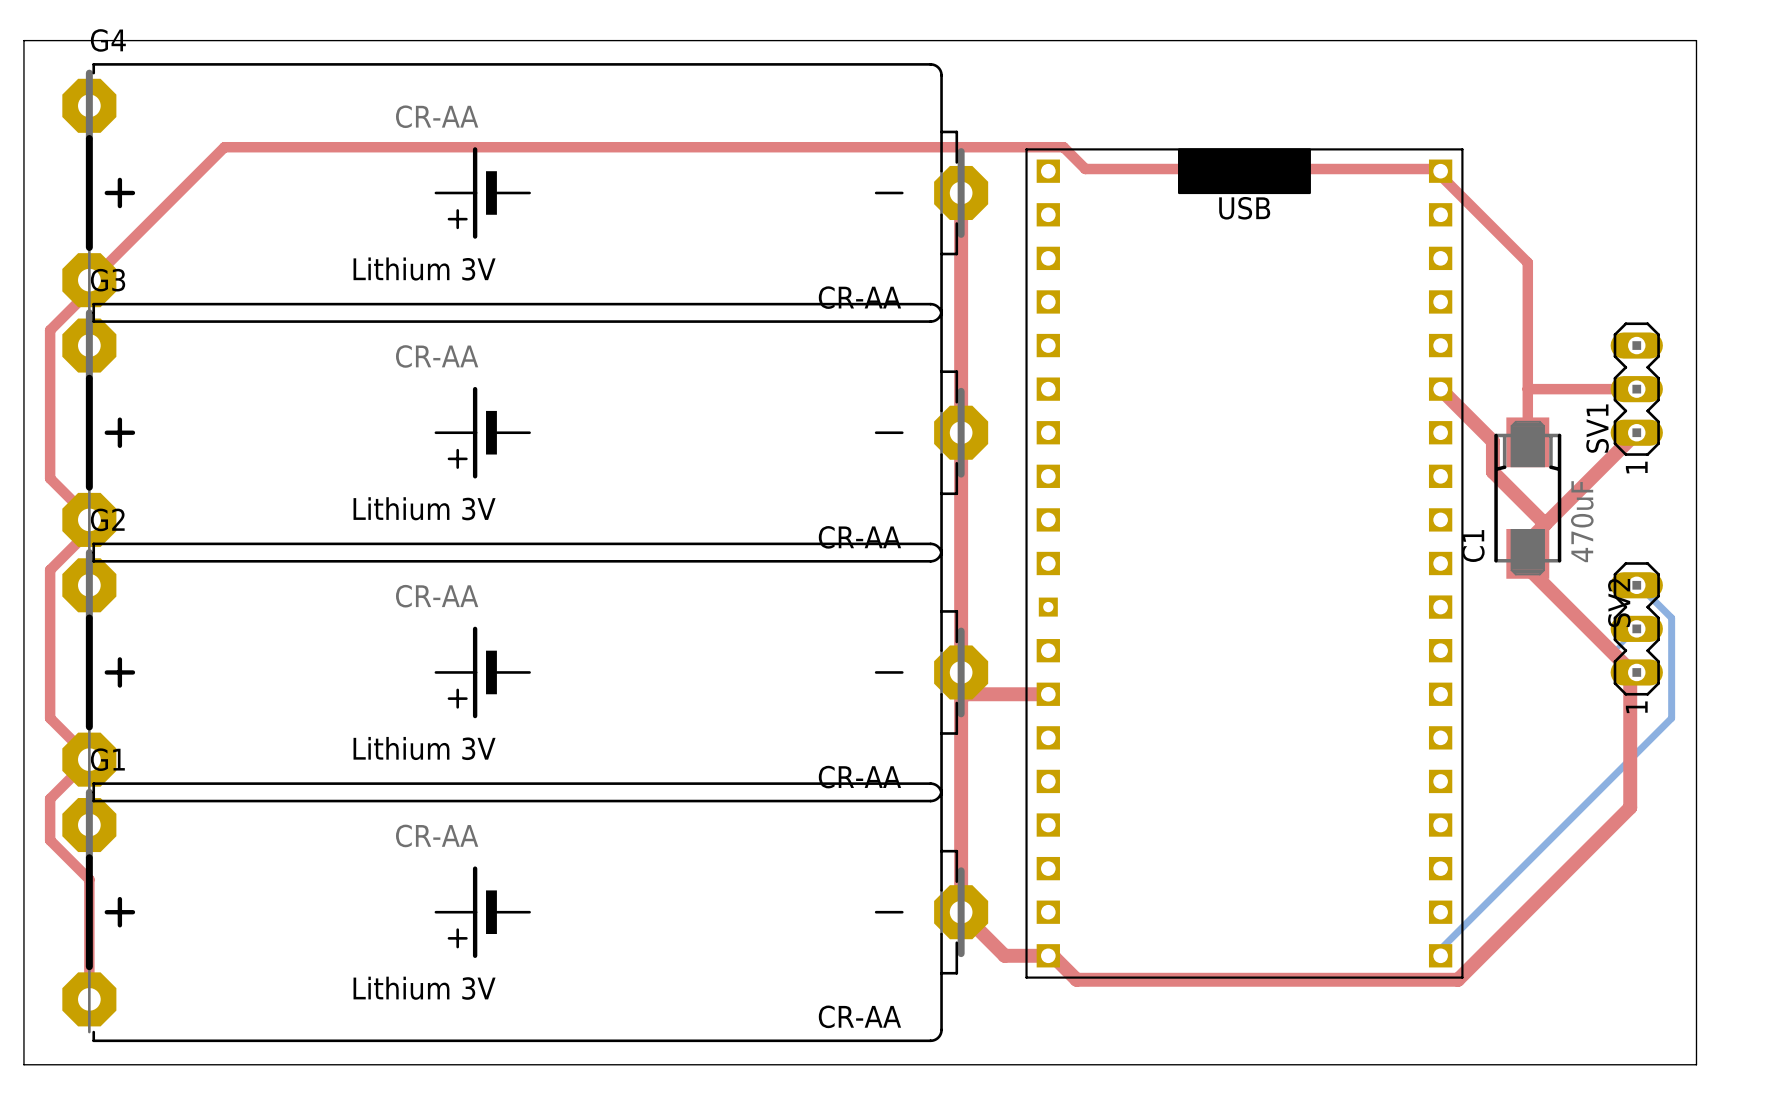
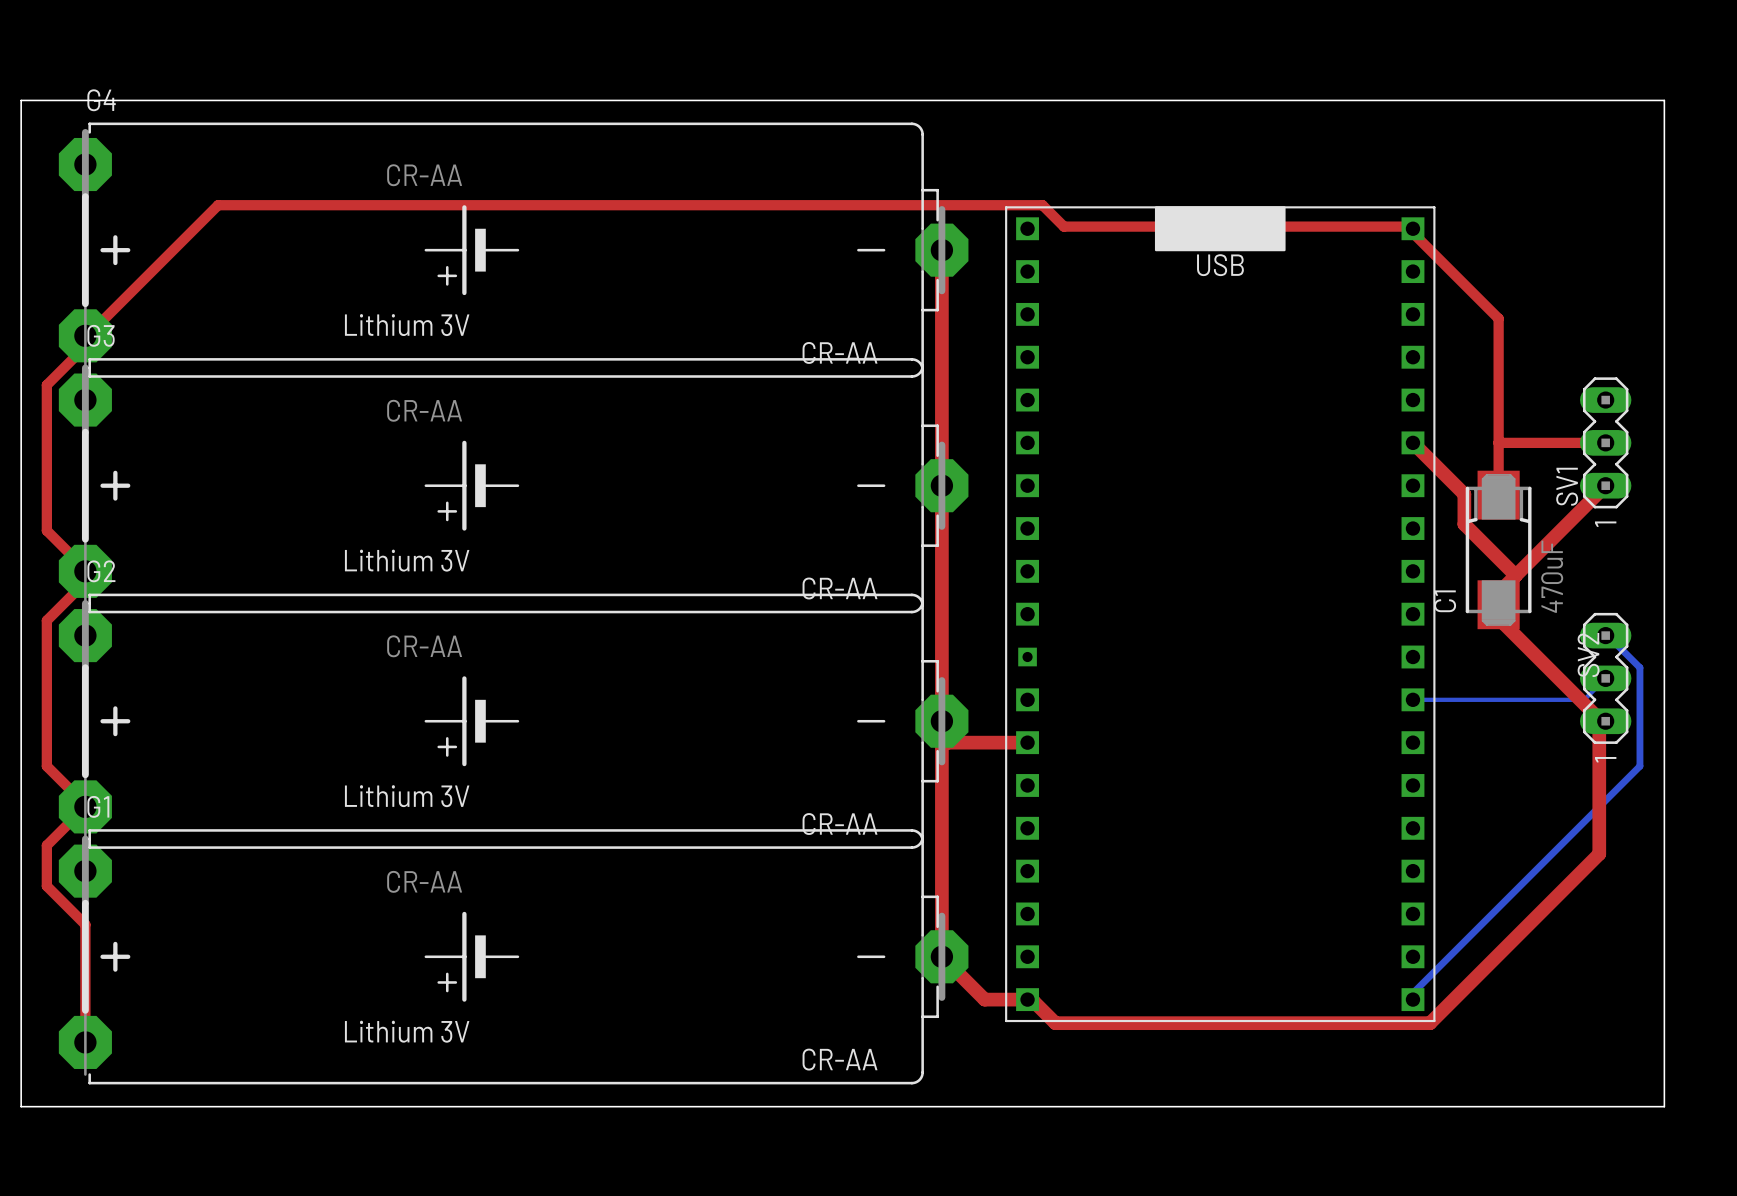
bottom track: none -> (1412, 699) (1584, 699)

